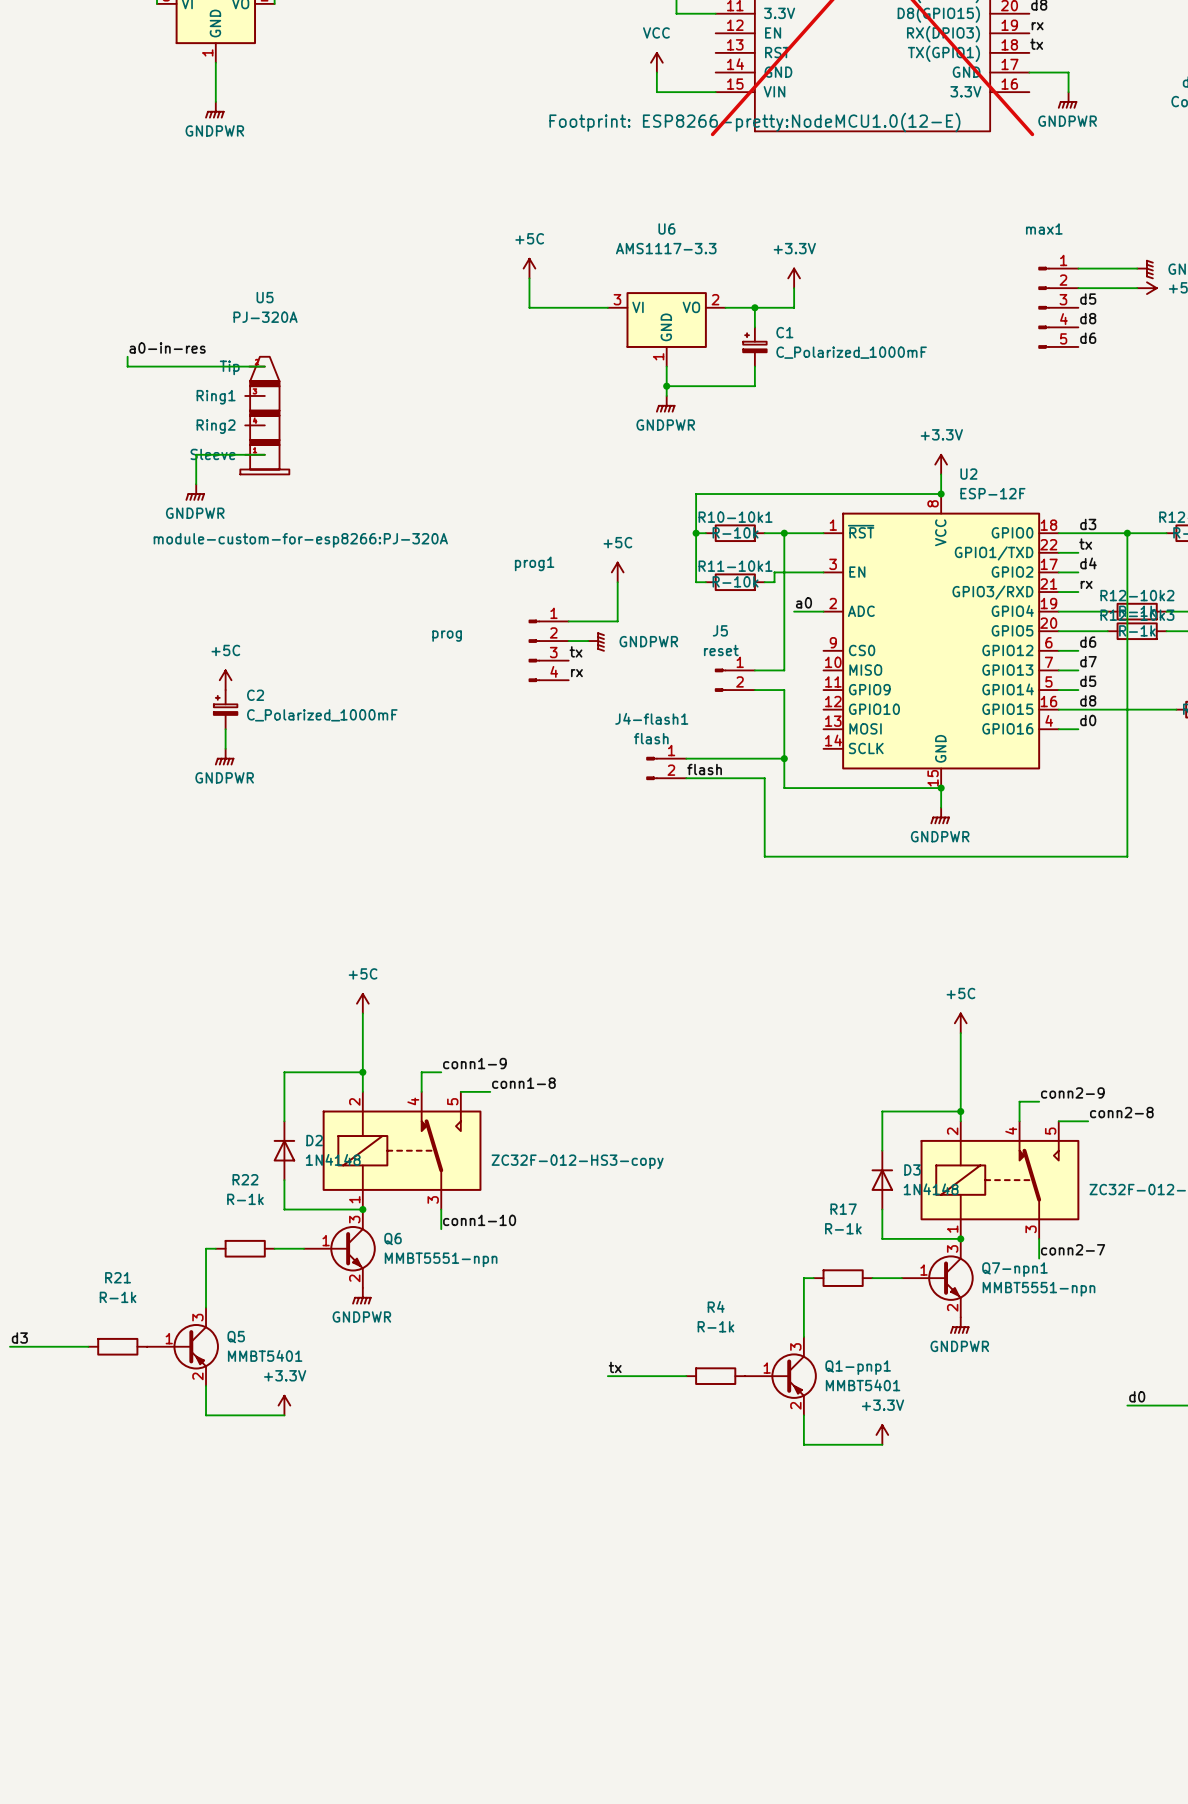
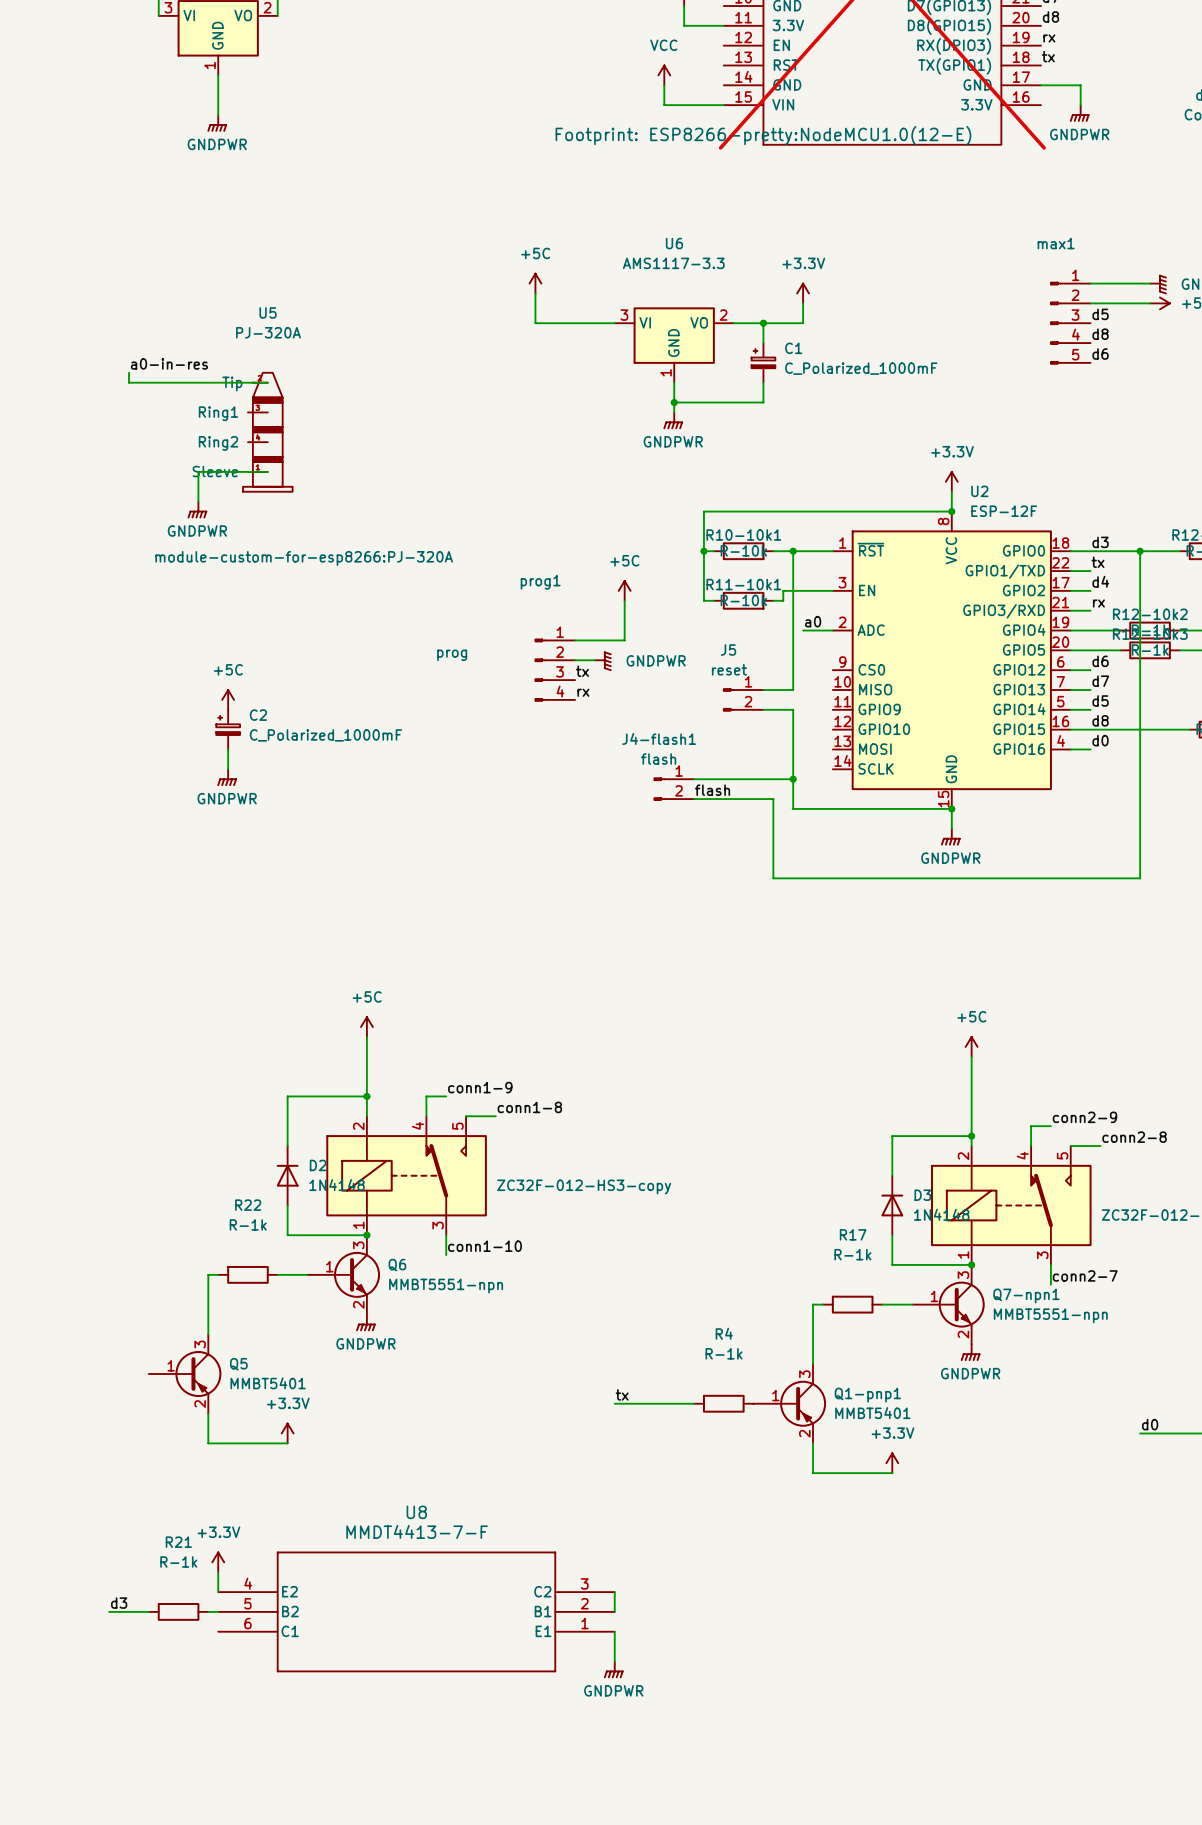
label: d3 (19, 1338) -> none
wire: (9, 1346) (88, 1346) -> none
R21 position: (117, 1346) -> (178, 1611)
power symbol: none -> +3.3V (218, 1562)
wire: none -> (218, 1572) (218, 1592)
wire: none -> (614, 1592) (614, 1611)
label: none -> d3 (119, 1603)
wire: none -> (109, 1611) (148, 1611)
wire: none -> (208, 1611) (218, 1611)
U8: none -> MMDT4413-7-F (416, 1611)
wire: none -> (614, 1631) (614, 1661)
power symbol: none -> GNDPWR (613, 1669)

